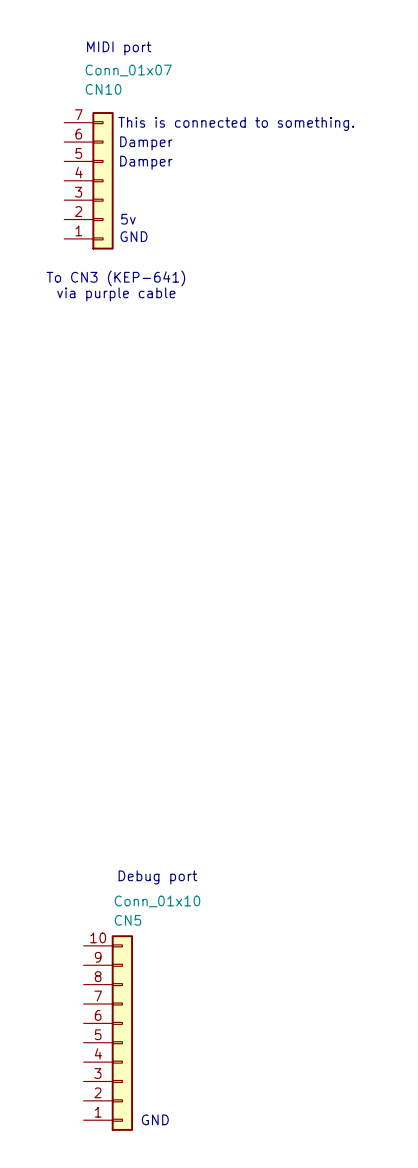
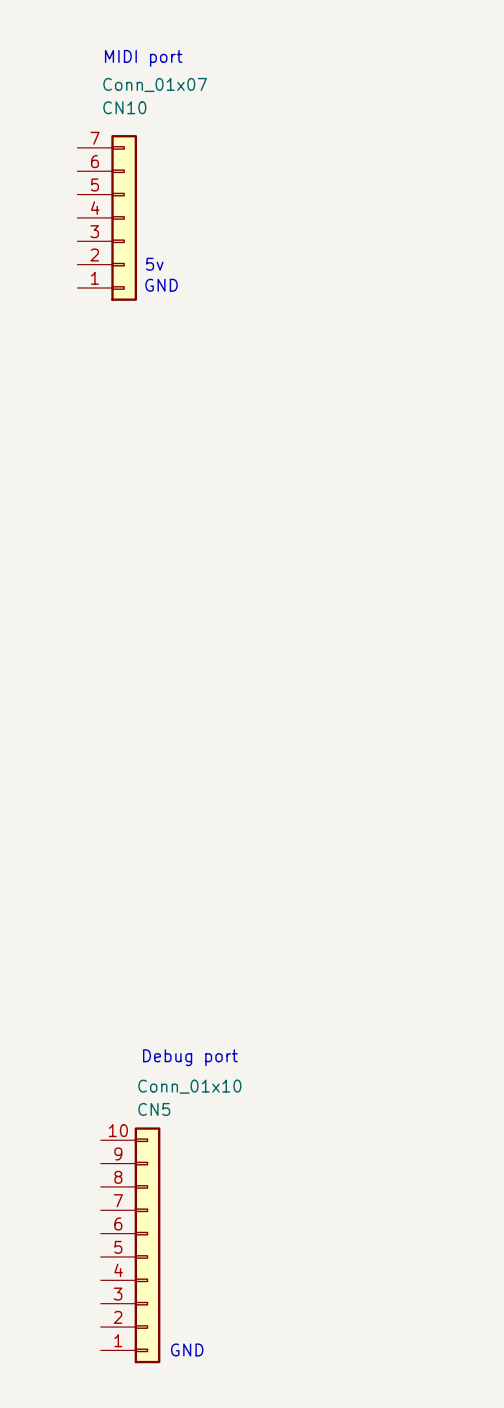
text: This is connected to something. (236, 123) -> none
text: Damper (146, 143) -> none
text: Damper (146, 162) -> none
text: To CN3 (KEP-641) (115, 278) -> none
text: via purple cable (116, 294) -> none

